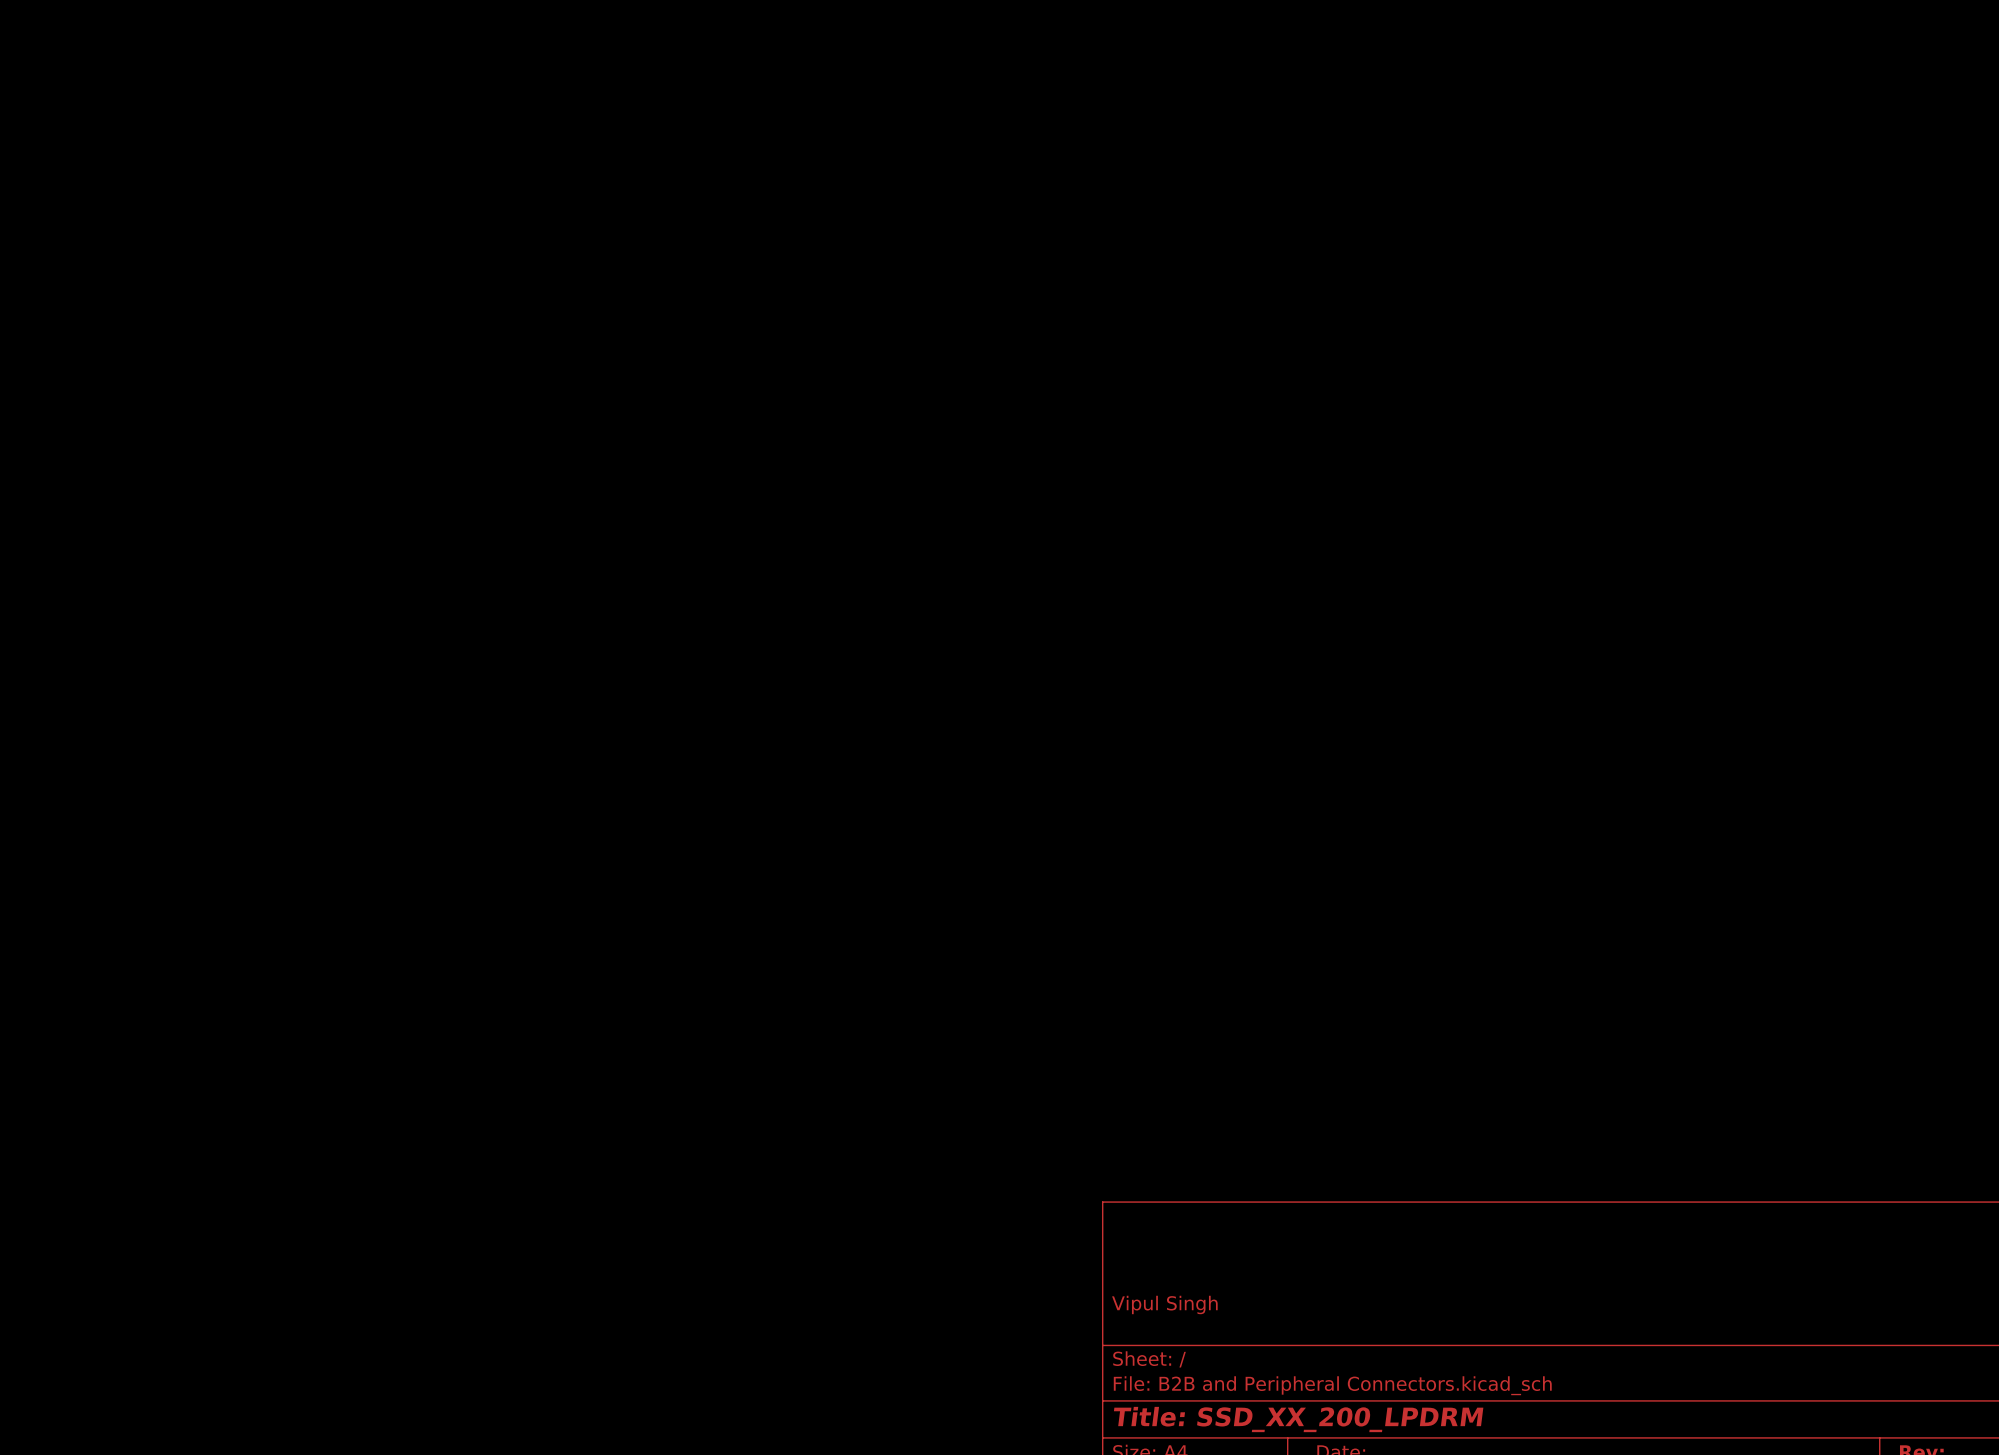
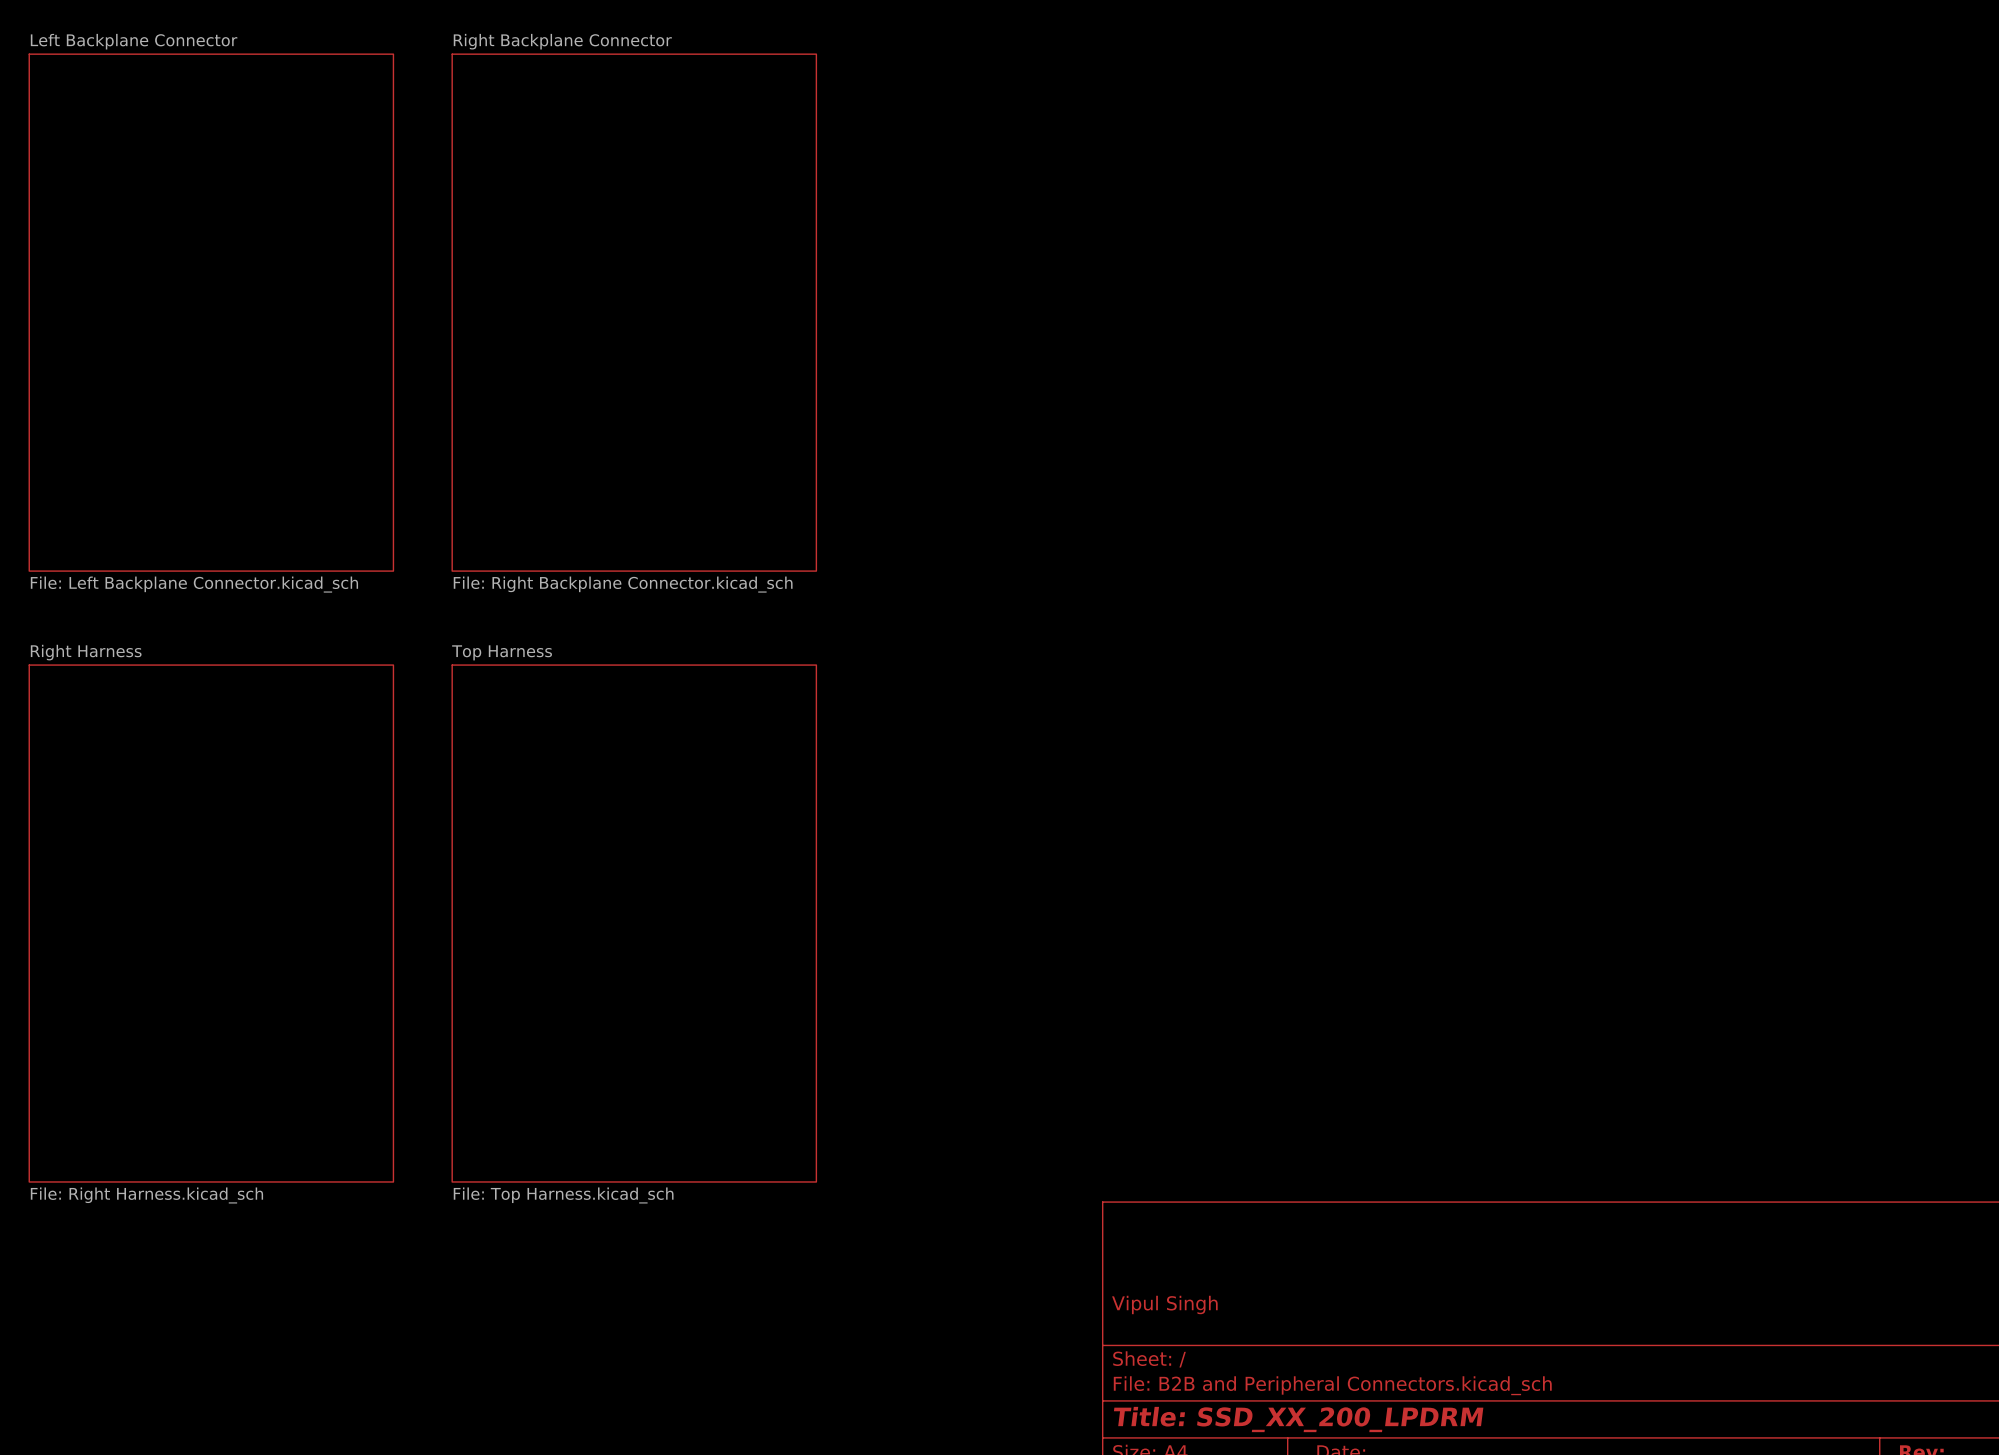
sheet Left Backplane Connector: none -> File: Left Backplane Connector.kicad_sch (211, 312)
sheet Right Backplane Connector: none -> File: Right Backplane Connector.kicad_sch (634, 312)
sheet Right Harness: none -> File: Right Harness.kicad_sch (211, 923)
sheet Top Harness: none -> File: Top Harness.kicad_sch (634, 923)

